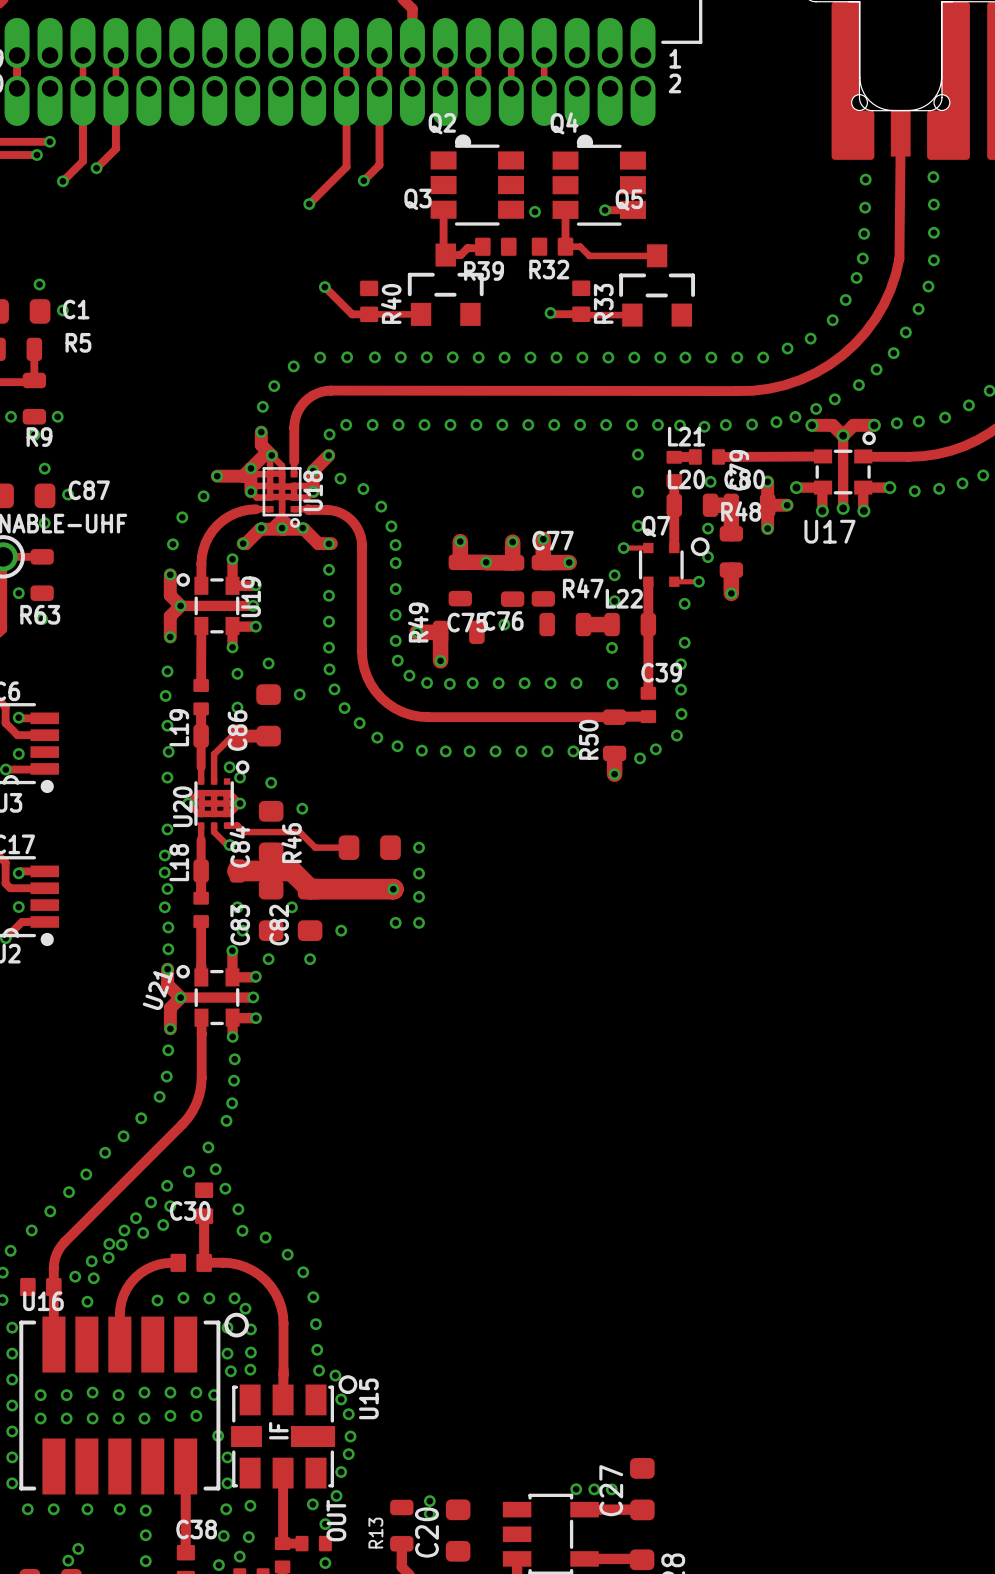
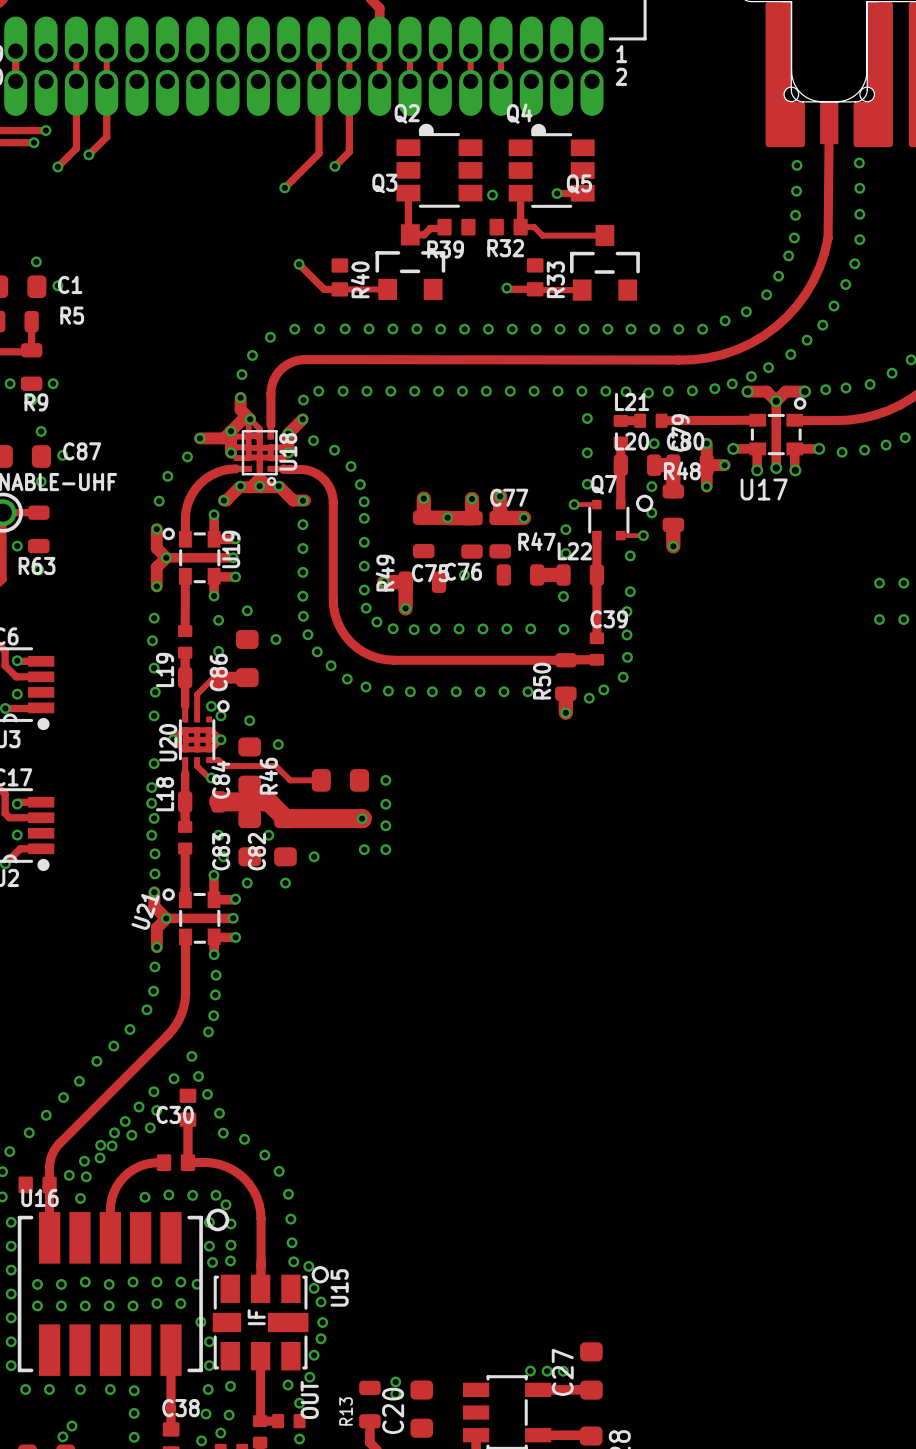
via: none -> (879, 583)
via: none -> (903, 583)
via: none -> (879, 619)
via: none -> (903, 619)

